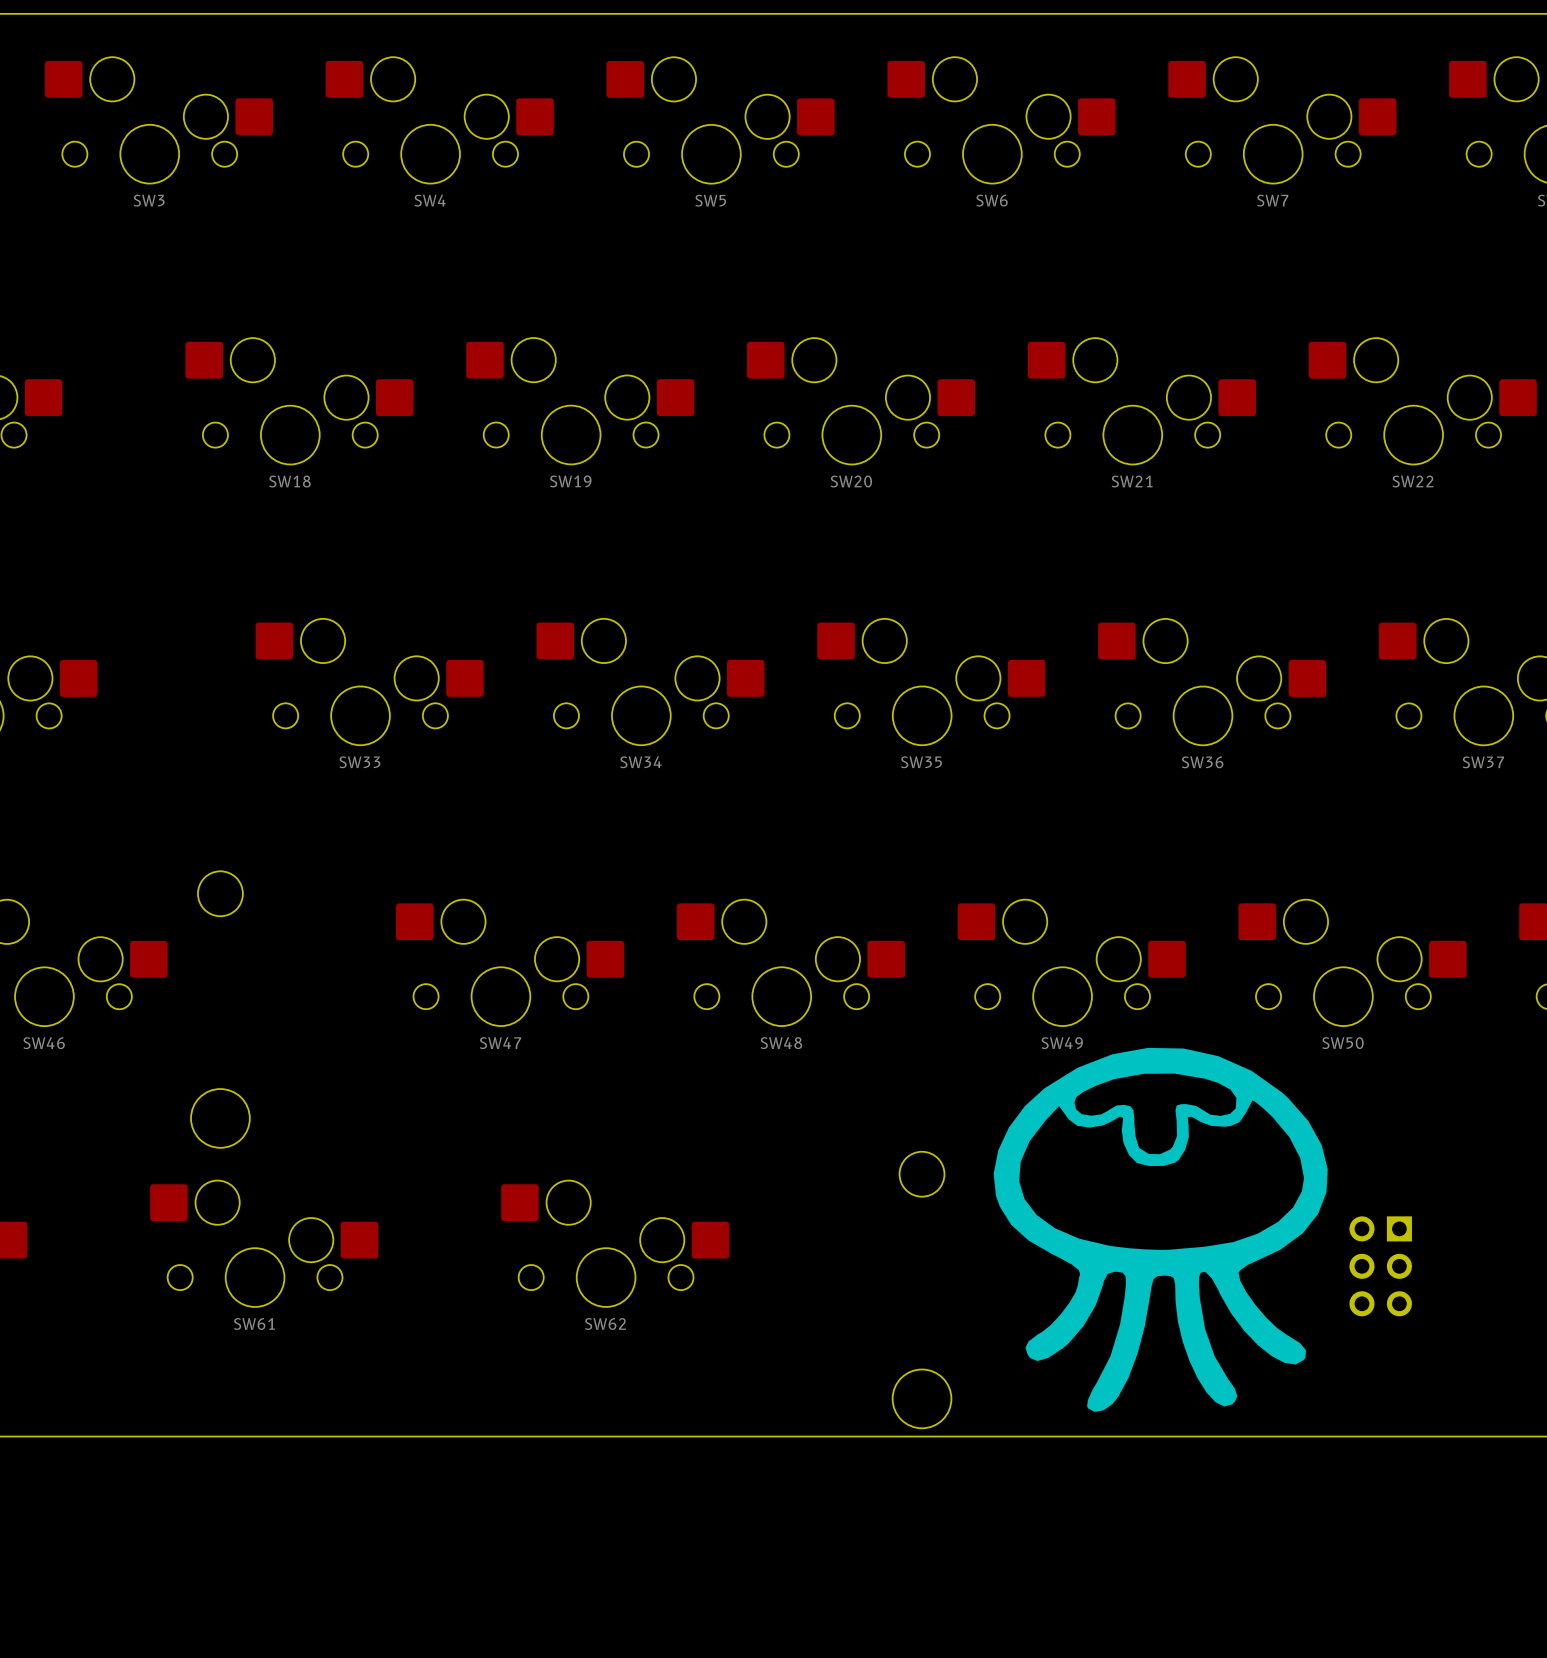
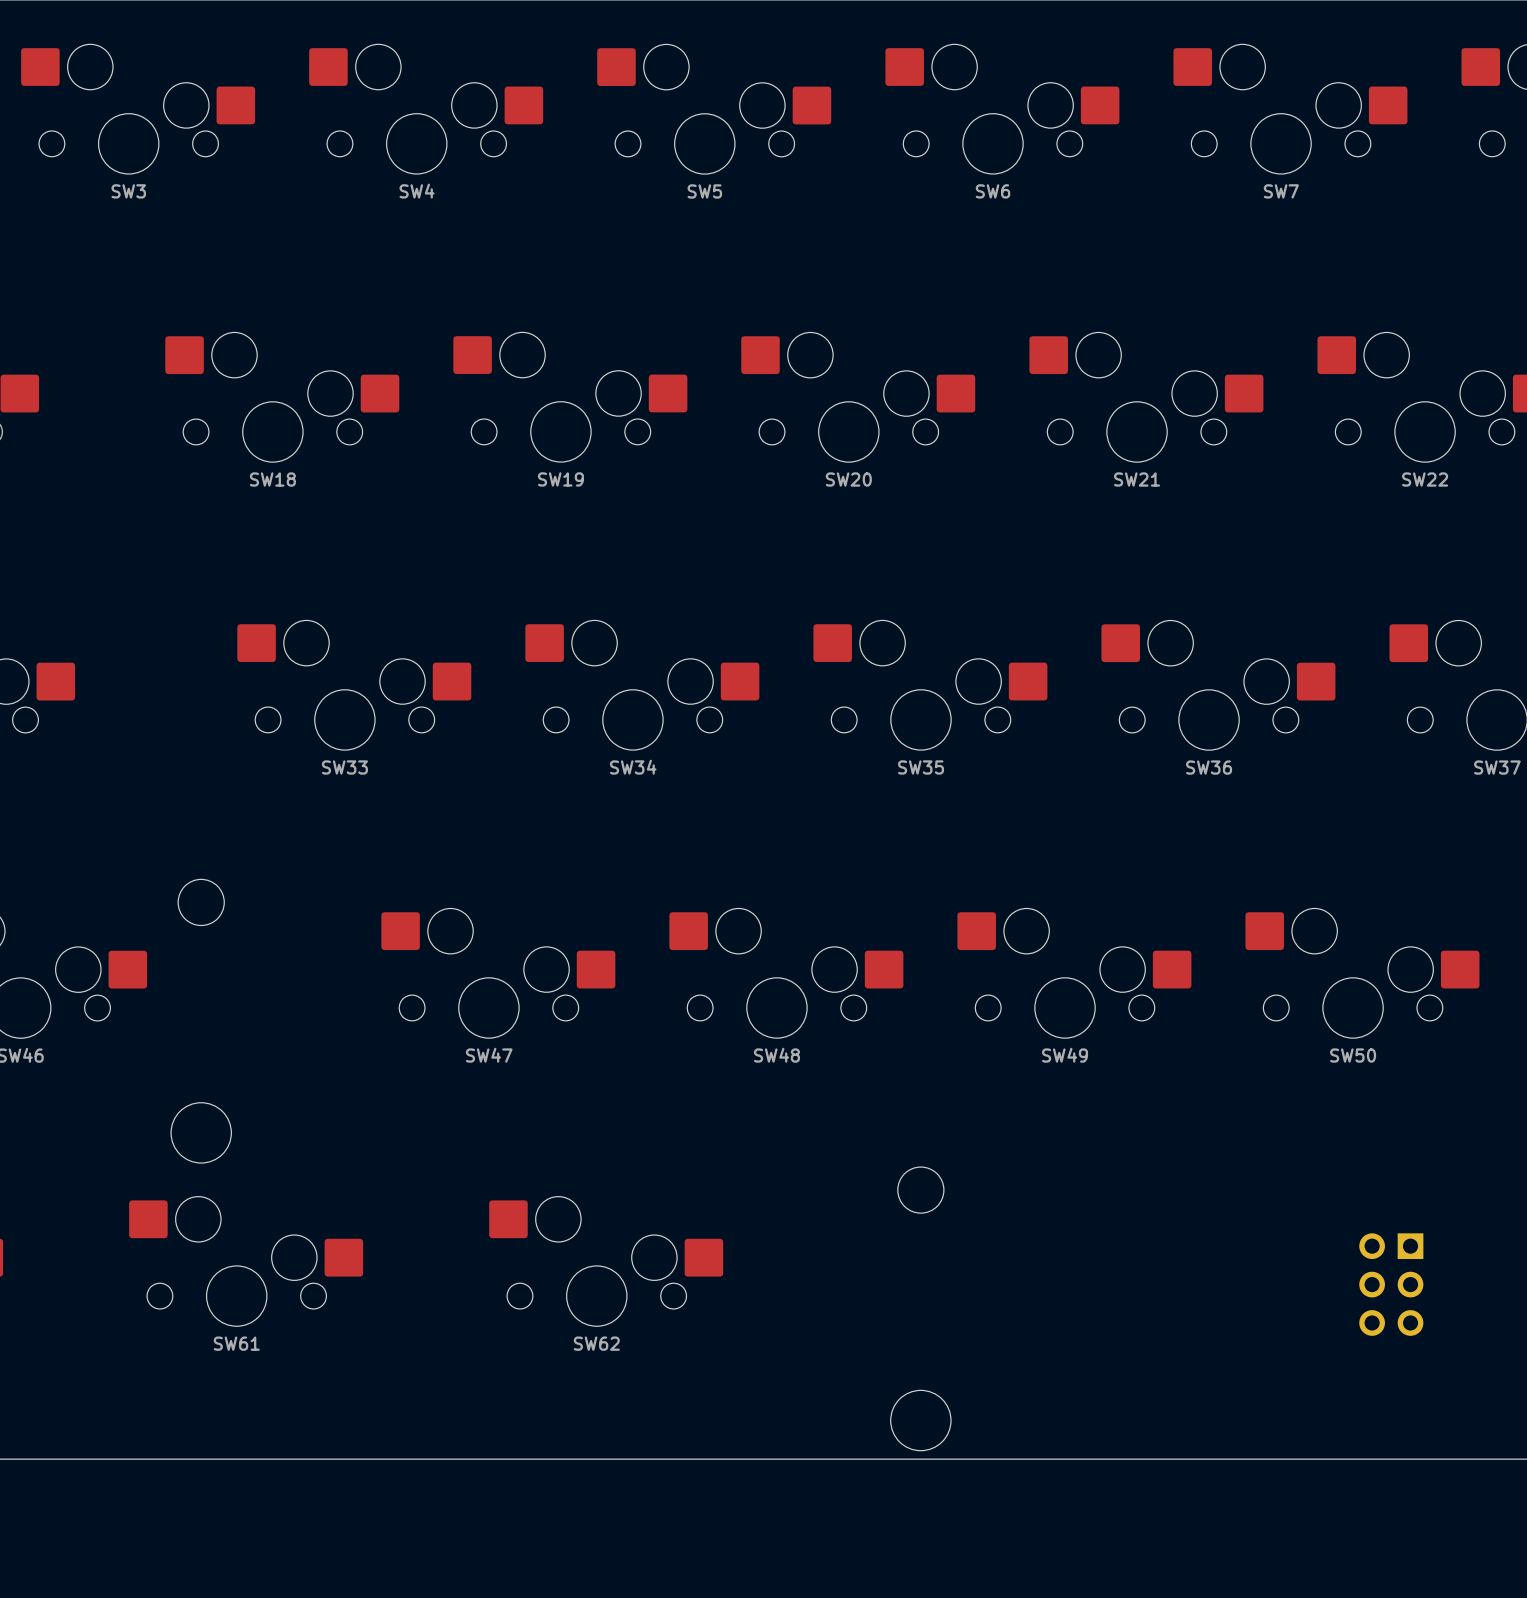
drawing: [993, 1047, 1328, 1412] -> none

